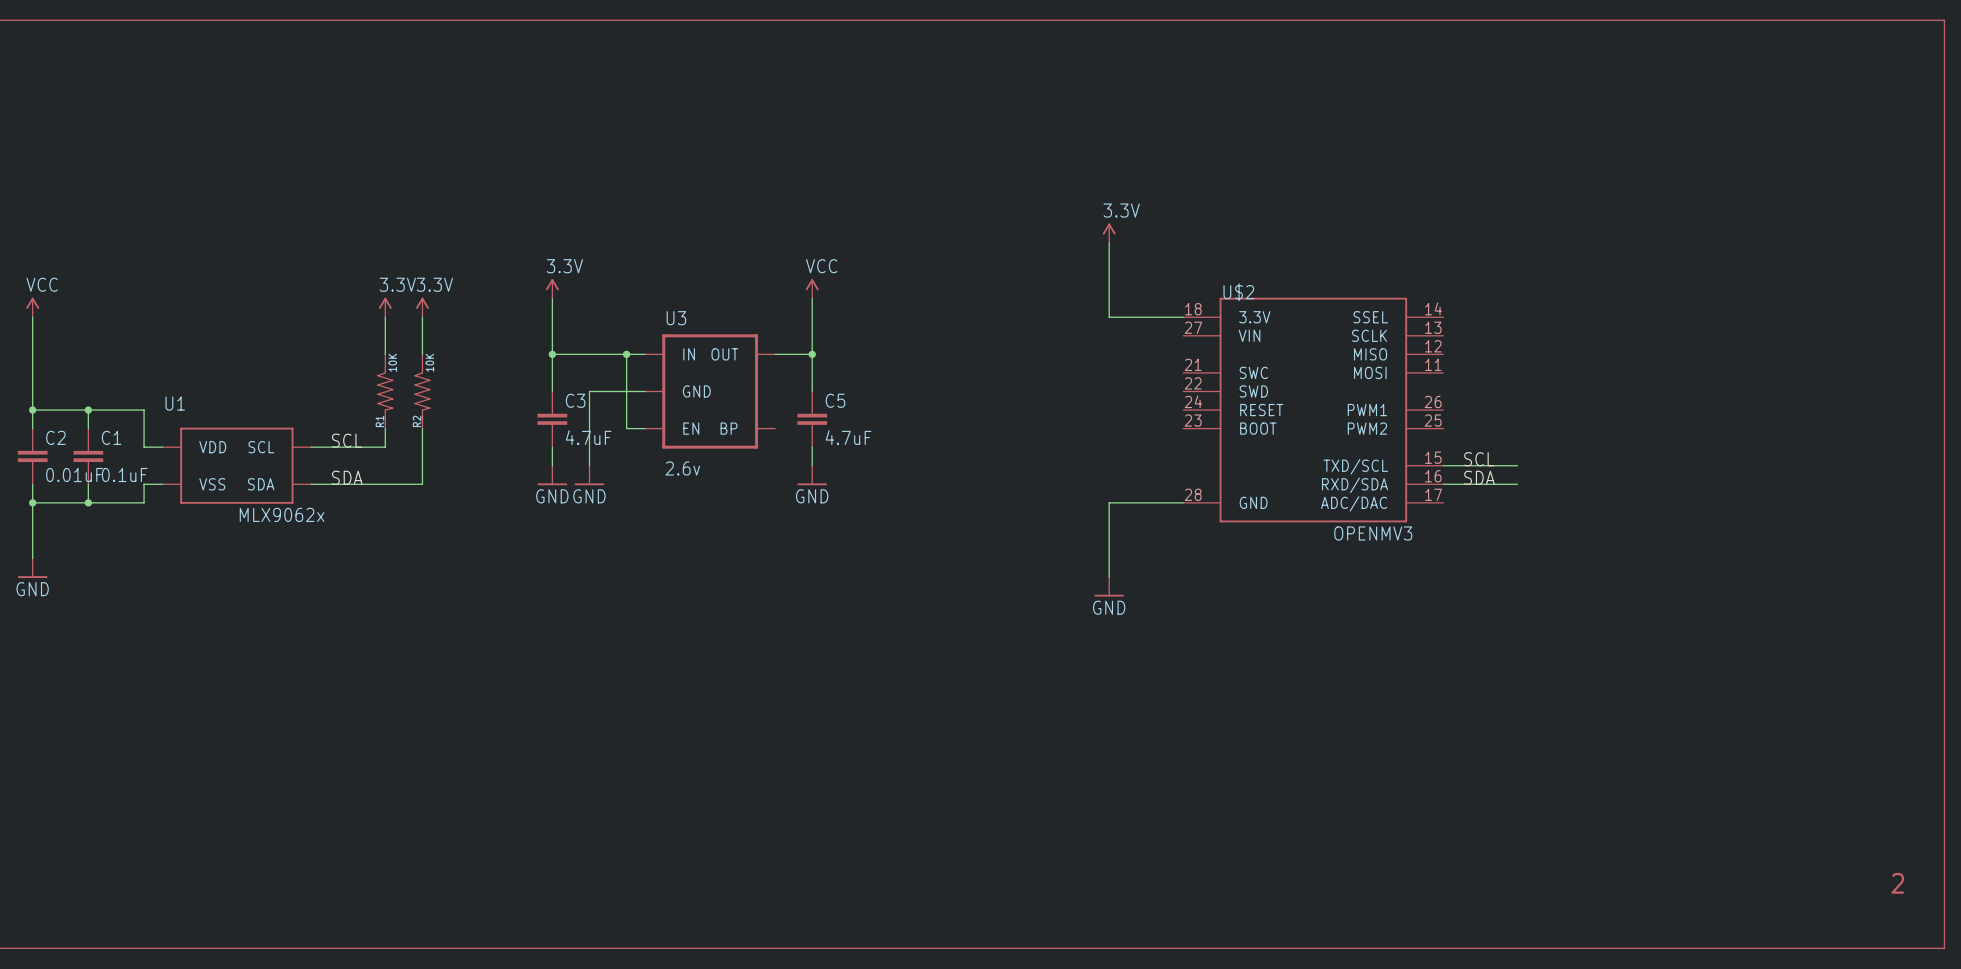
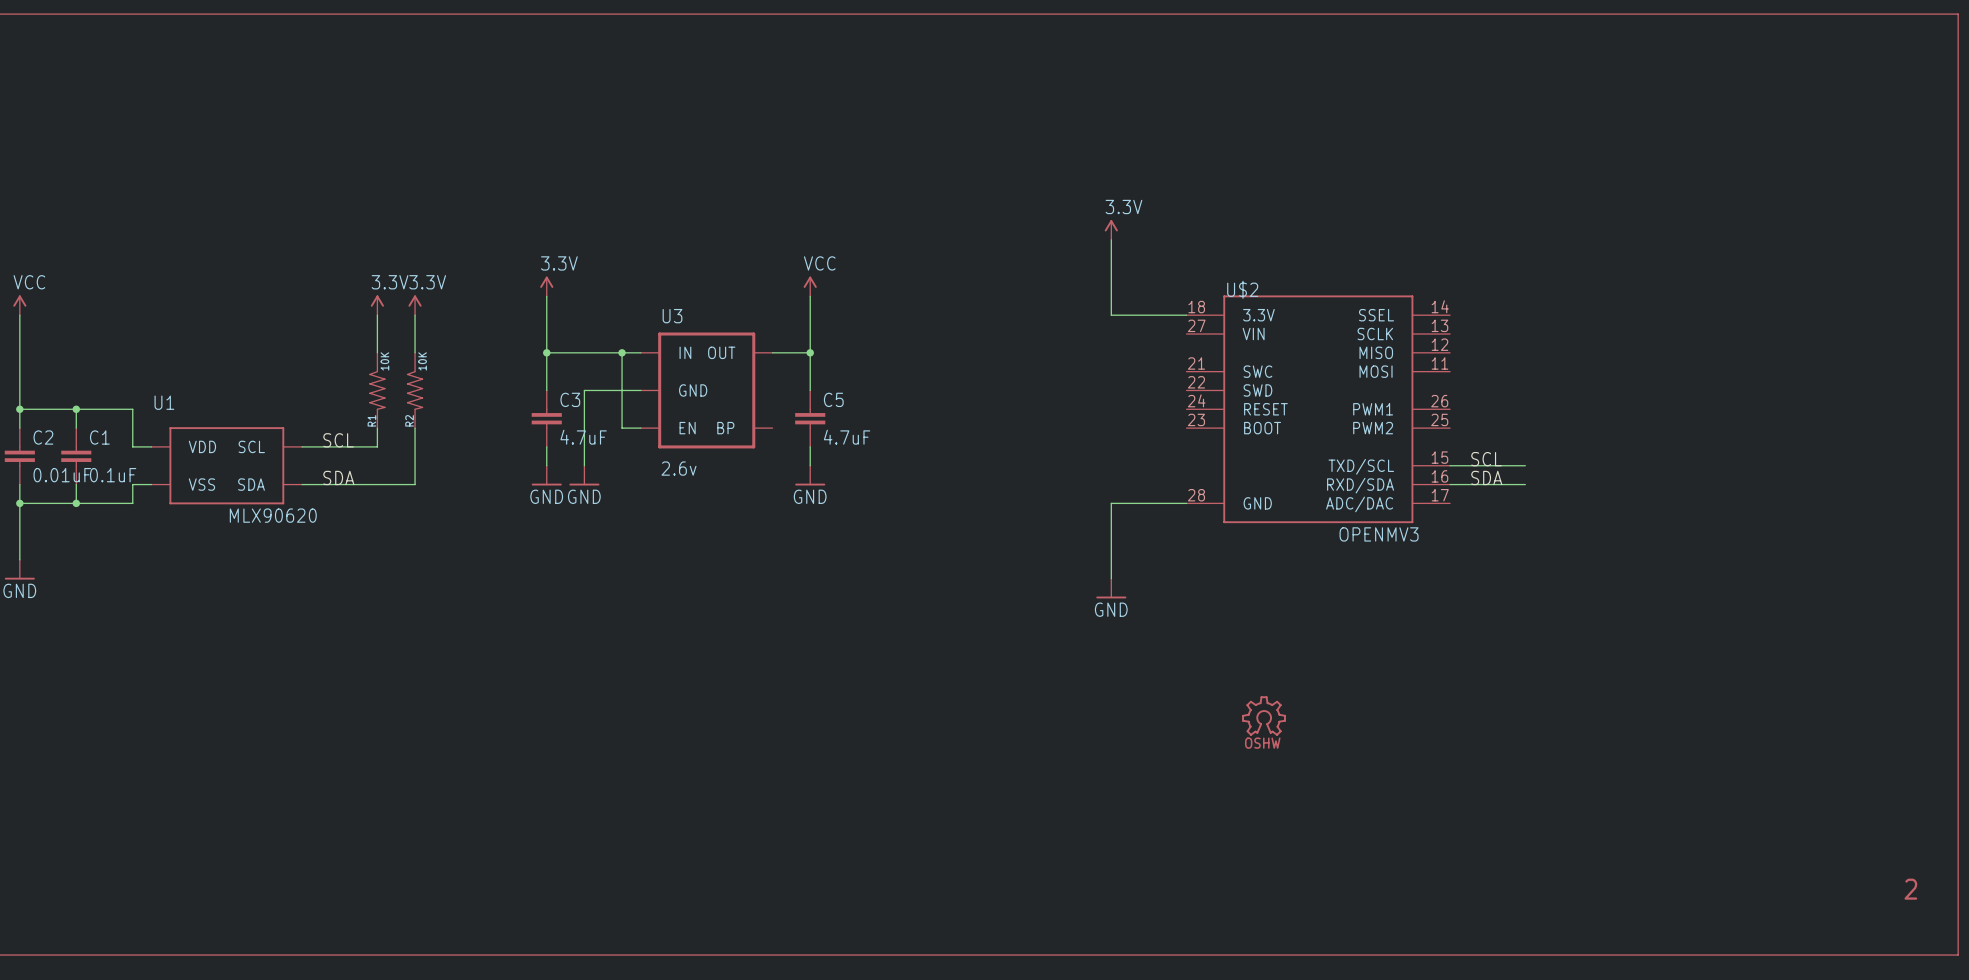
U1 value: MLX9062x (282, 514) -> MLX90620 (273, 515)
part: none -> (1264, 716)

